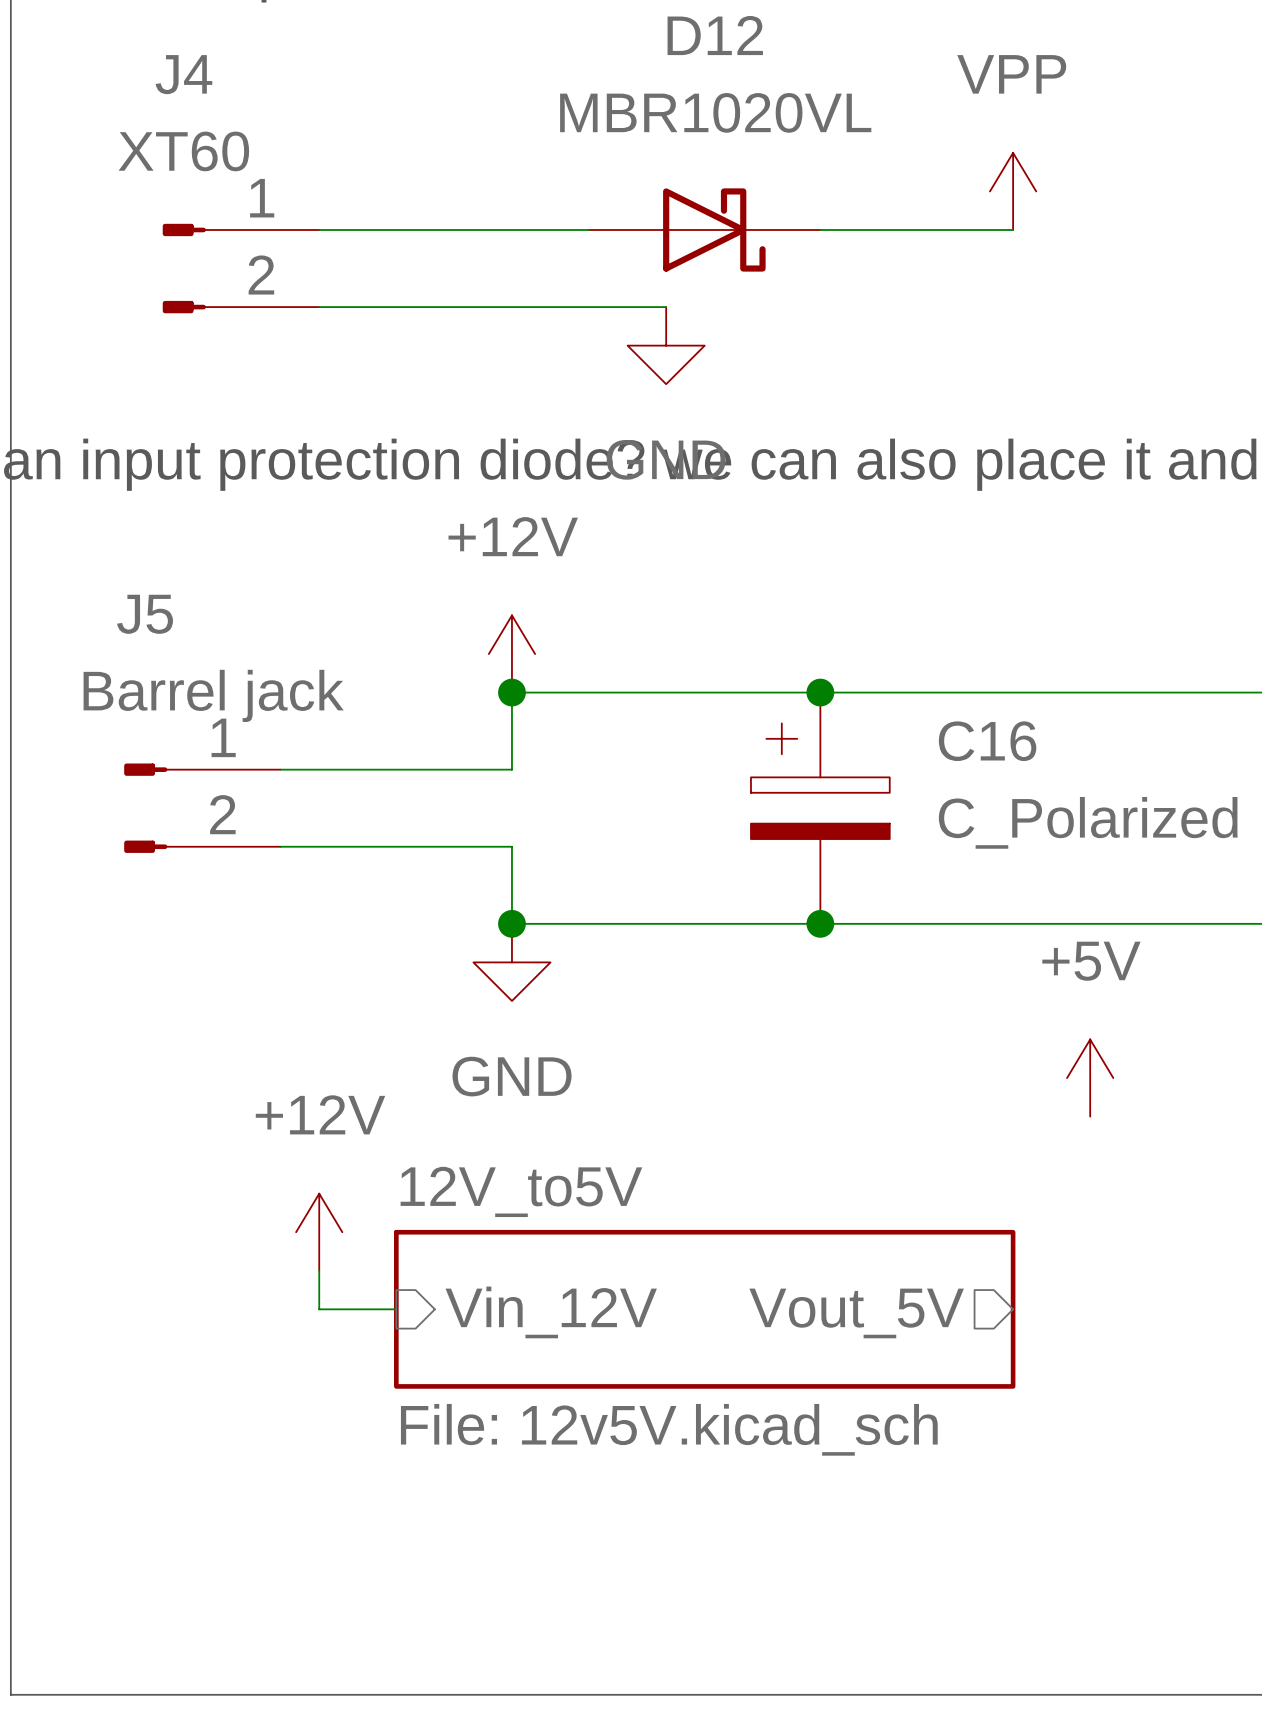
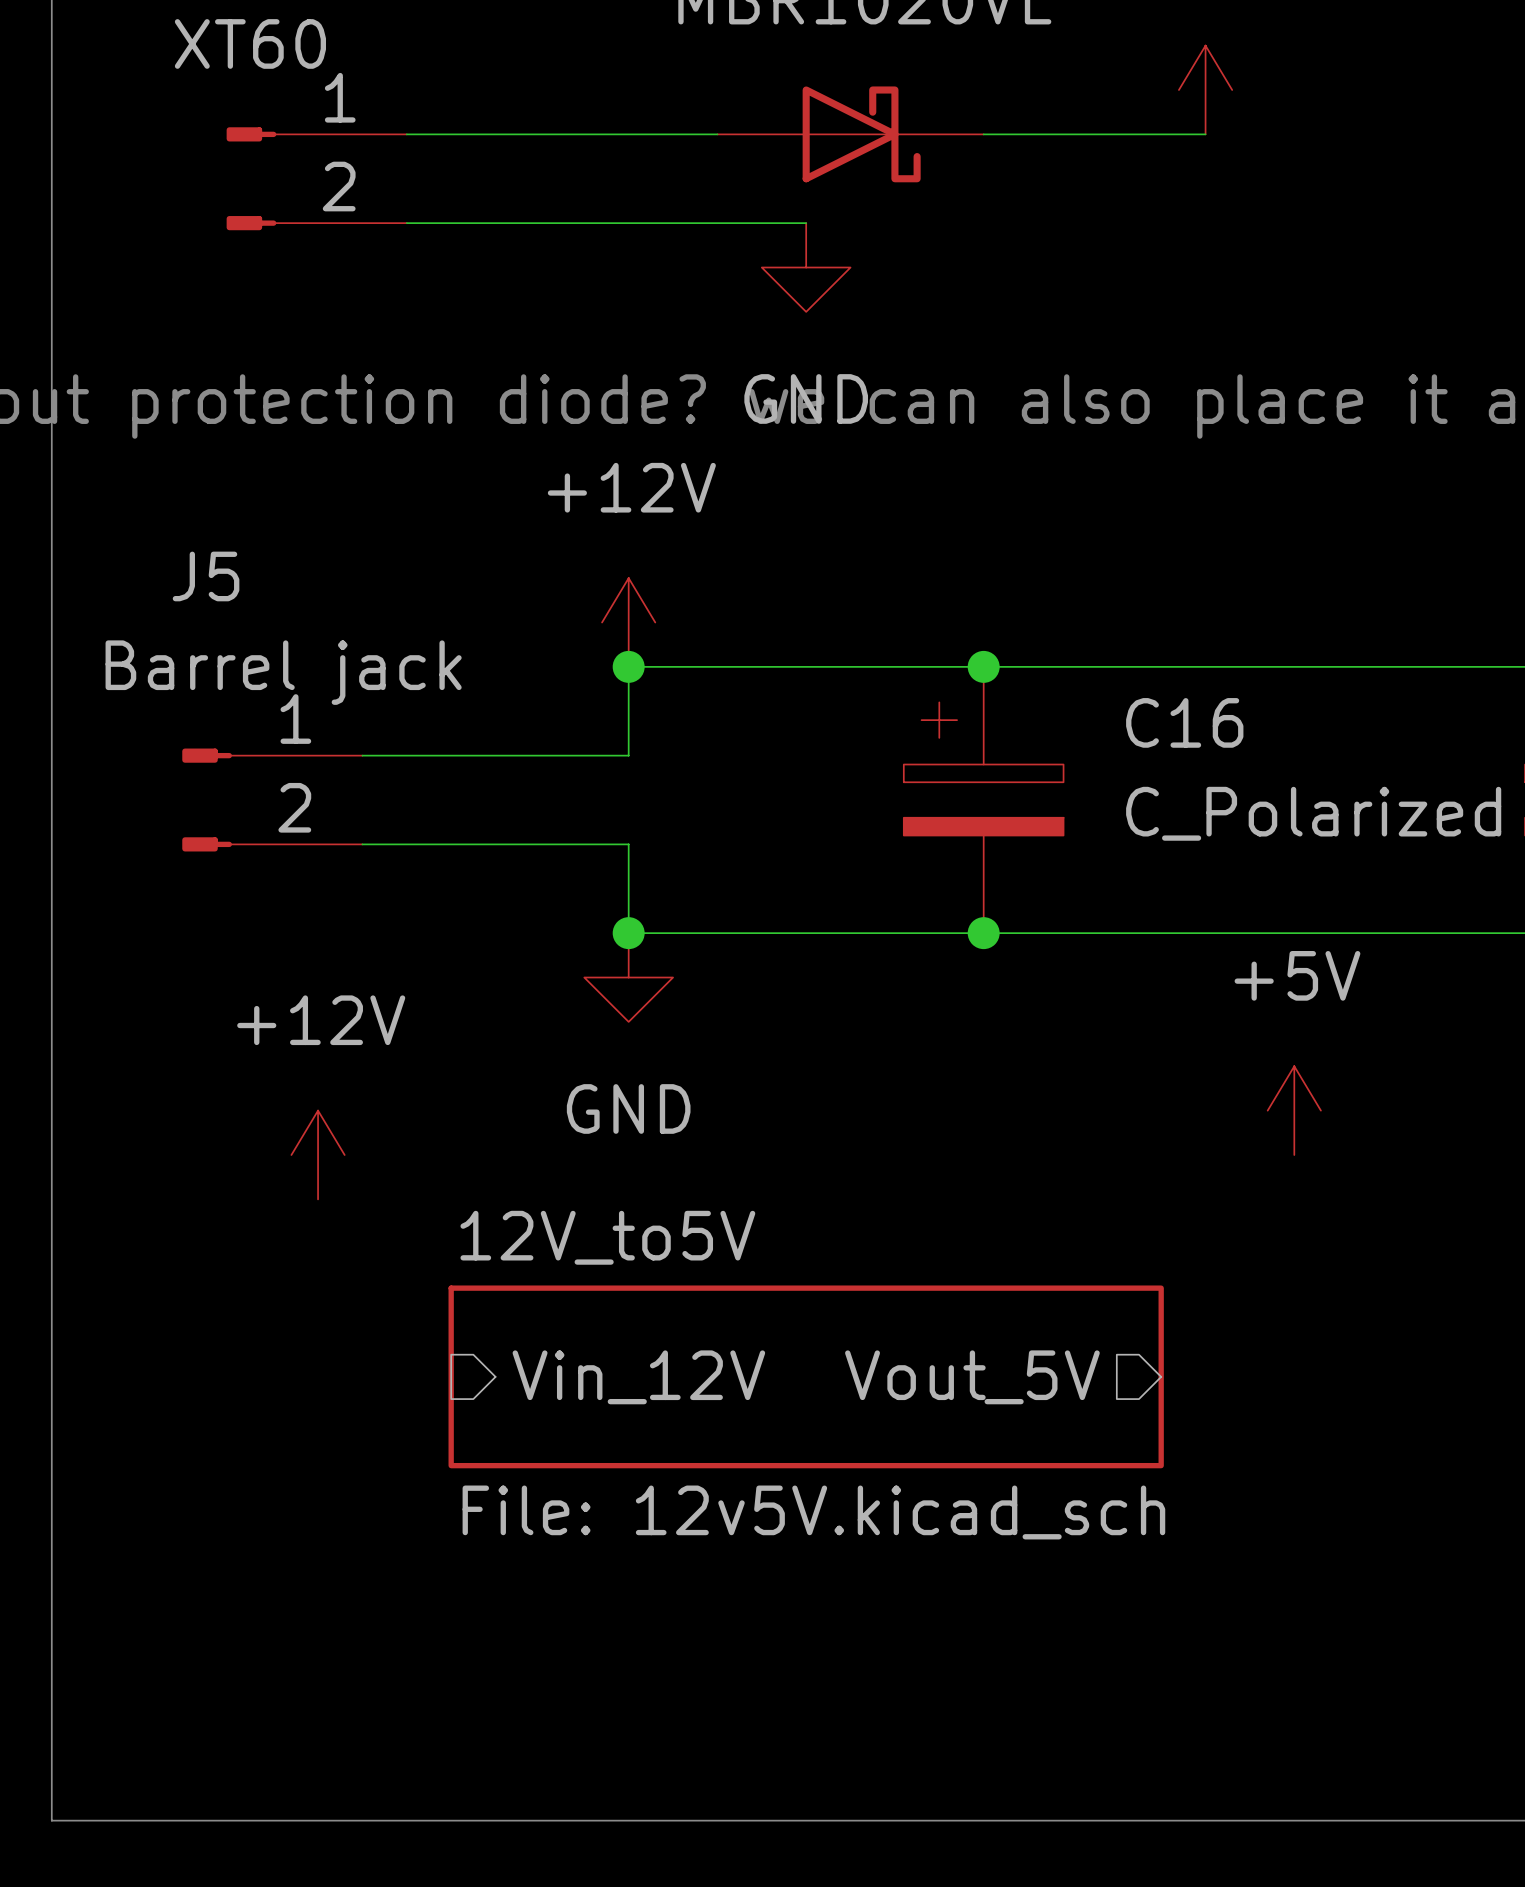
power symbol position: +12V (319, 1232) -> +12V (318, 1155)
wire: (319, 1270) (319, 1309) (396, 1309) -> none
sheet 12V_to5V position: (704, 1309) -> (806, 1376)
sheet pin position: Vin_12V (551, 1312) -> Vin_12V (638, 1377)
sheet pin position: Vout_5V (856, 1313) -> Vout_5V (972, 1377)

